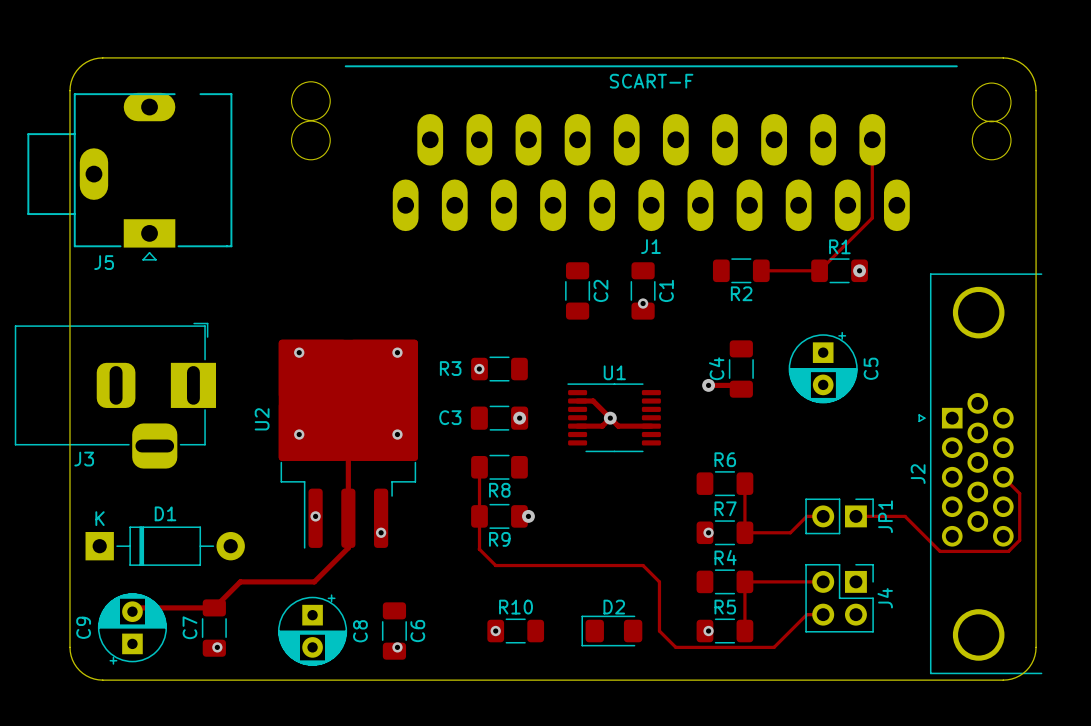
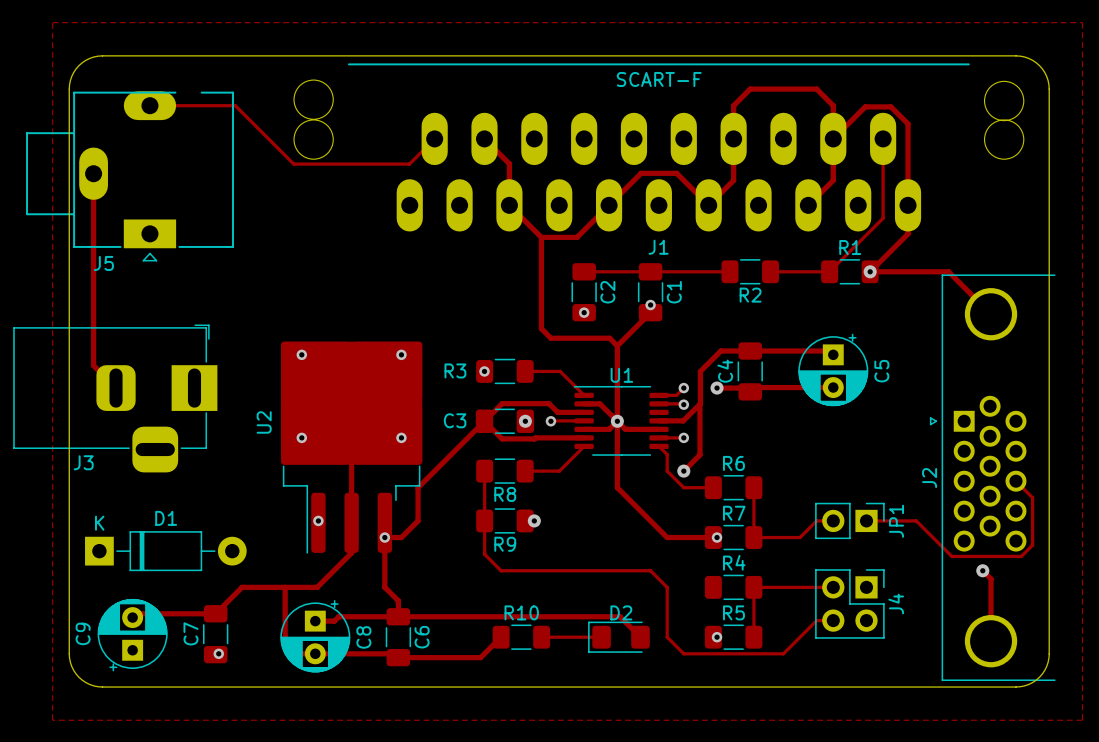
zone outline: none -> (52, 22) (1082, 22) (1082, 720) (52, 720) (52, 22)
track: none -> (149, 105) (235, 105) (293, 164) (409, 164) (434, 138)
track: none -> (484, 138) (509, 163) (509, 205) (541, 237)
track: none -> (833, 138) (865, 106) (890, 106) (908, 123) (908, 233) (870, 271) (948, 271) (991, 314)
track: none -> (93, 173) (93, 365) (116, 388)
track: none -> (808, 205) (833, 180) (833, 105) (816, 89) (750, 89) (733, 105) (733, 180) (708, 205) (676, 173) (641, 173) (577, 237) (541, 237)
track: none -> (541, 237) (541, 328) (550, 338) (609, 338) (617, 345)
track: none -> (584, 271) (729, 271)
via: none -> (584, 312)
track: none -> (650, 312) (617, 345)
track: none -> (617, 345) (617, 487) (667, 537) (713, 537)
track: none -> (833, 354) (829, 351) (720, 351) (700, 371) (700, 403) (683, 420) (659, 420)
track: none -> (525, 371) (560, 371) (584, 395)
track: none -> (833, 387) (754, 387) (750, 391)
track: none -> (683, 388) (676, 395) (659, 395)
via: none -> (683, 388)
track: none -> (659, 403) (683, 404)
via: none -> (683, 404)
track: none -> (699, 404) (699, 454) (683, 471)
track: none -> (584, 412) (557, 412) (549, 403) (502, 403) (418, 487) (418, 520) (401, 537) (384, 537)
track: none -> (584, 420) (550, 421)
track: none -> (484, 421) (502, 438) (584, 437)
via: none -> (550, 421)
track: none -> (659, 437) (683, 437)
via: none -> (683, 437)
track: none -> (584, 446) (559, 471) (525, 471)
track: none -> (659, 446) (667, 454) (667, 471) (683, 487) (713, 487)
via: none -> (683, 471)
track: none -> (384, 522) (384, 587) (398, 600) (398, 616)
track: none -> (982, 570) (991, 579) (991, 641)
via: none -> (982, 570)
track: none -> (285, 587) (285, 637) (301, 653) (394, 653) (398, 657) (480, 657) (501, 637)
track: none -> (315, 621) (334, 621) (338, 616) (620, 616) (640, 637)
via: (495, 631) -> none
track: none -> (541, 637) (601, 637)
via: (397, 647) -> none

